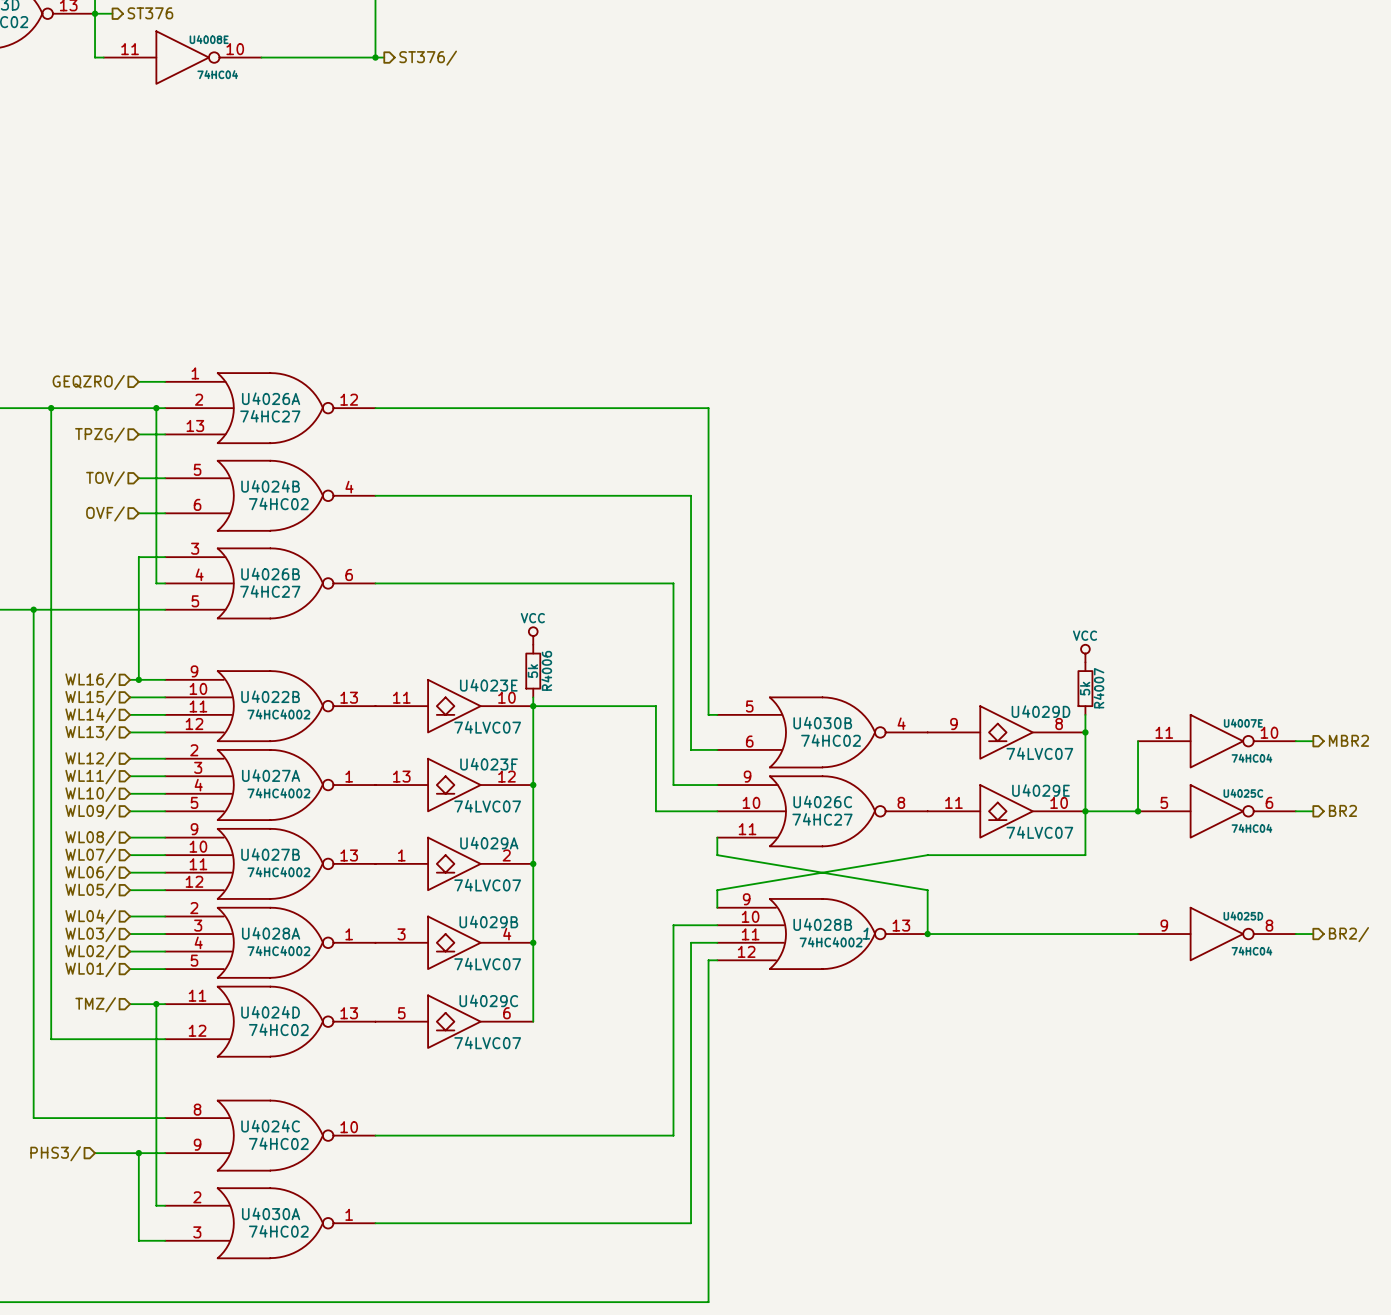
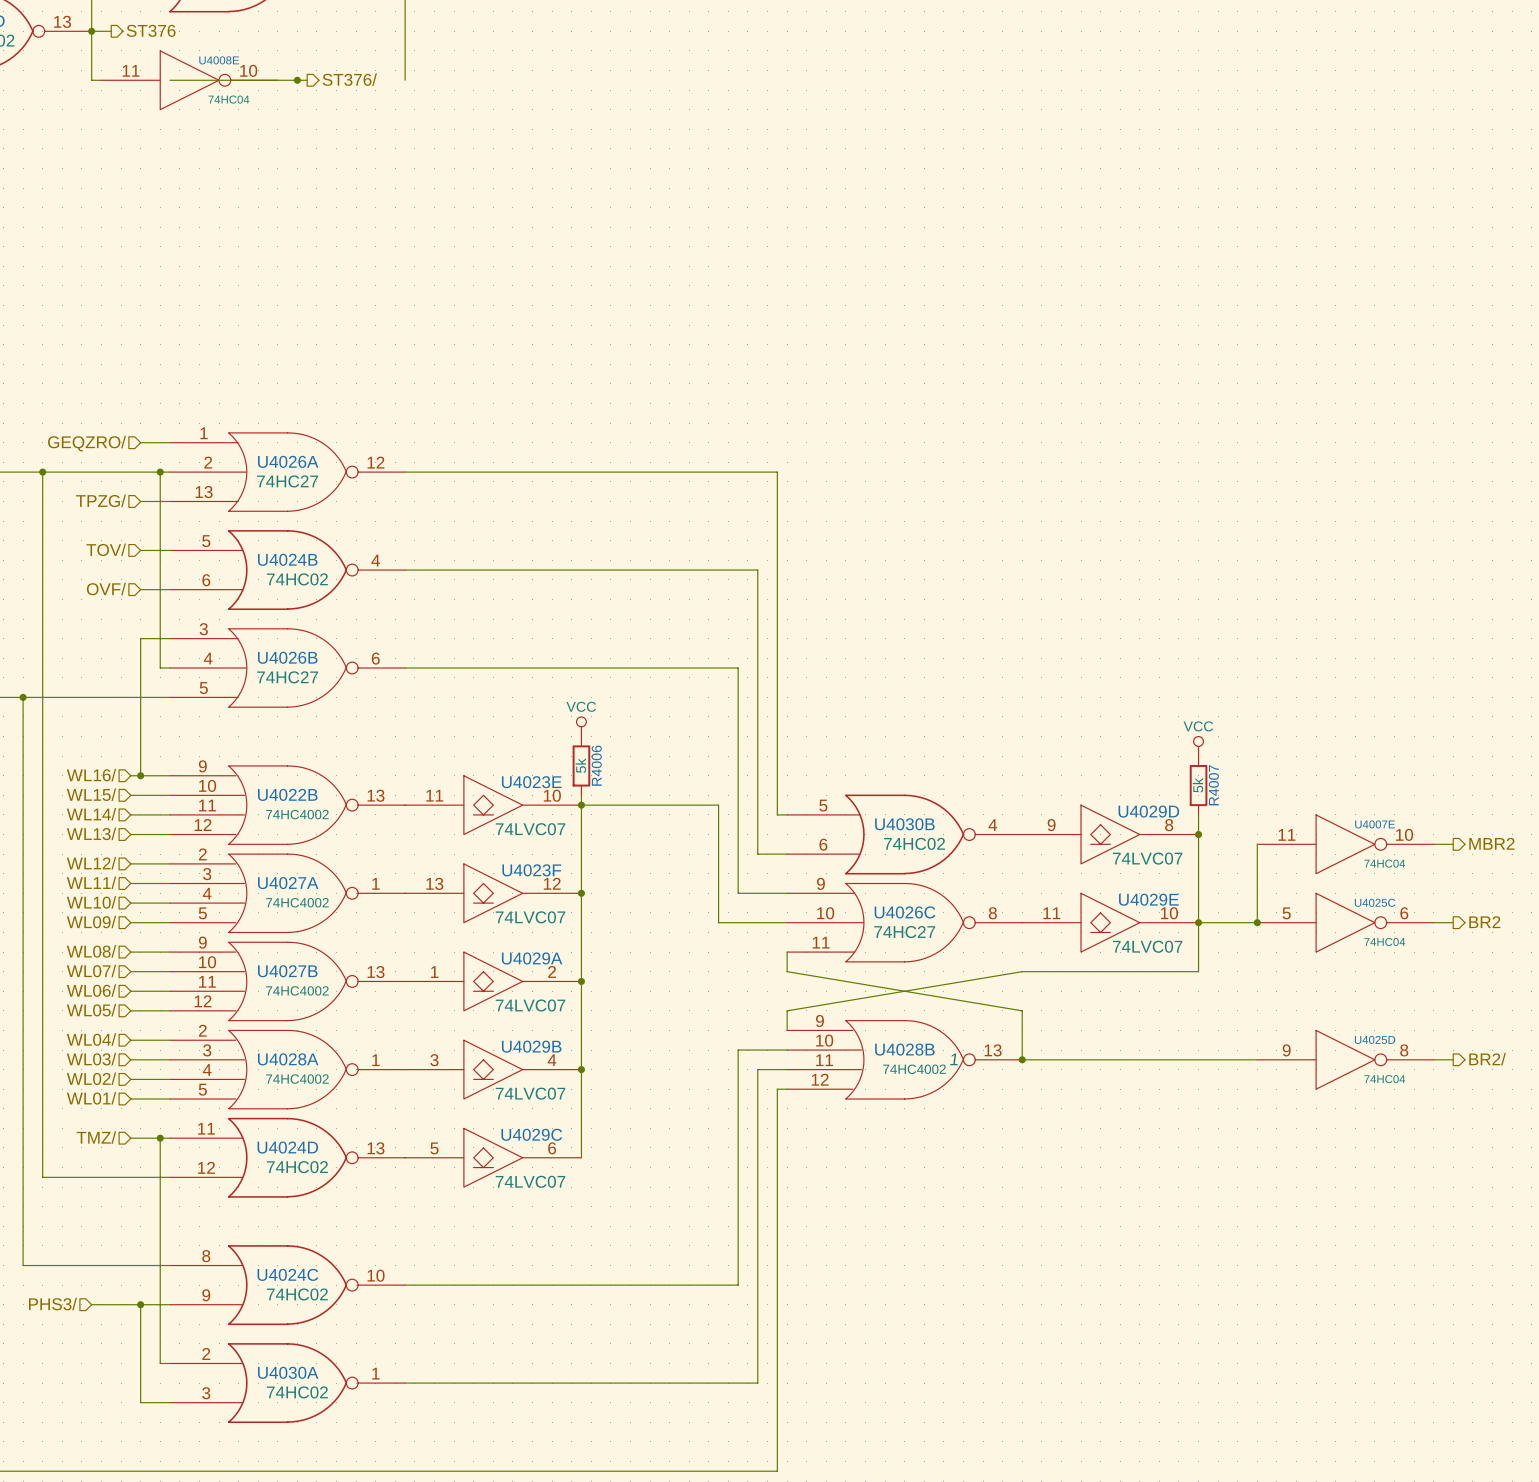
junction: none -> (297, 80)
wire: (287, 57) (384, 57) -> (170, 80) (277, 80)
junction: (375, 57) -> none
hierarchical label position: ST376/ (428, 58) -> ST376/ (349, 79)

